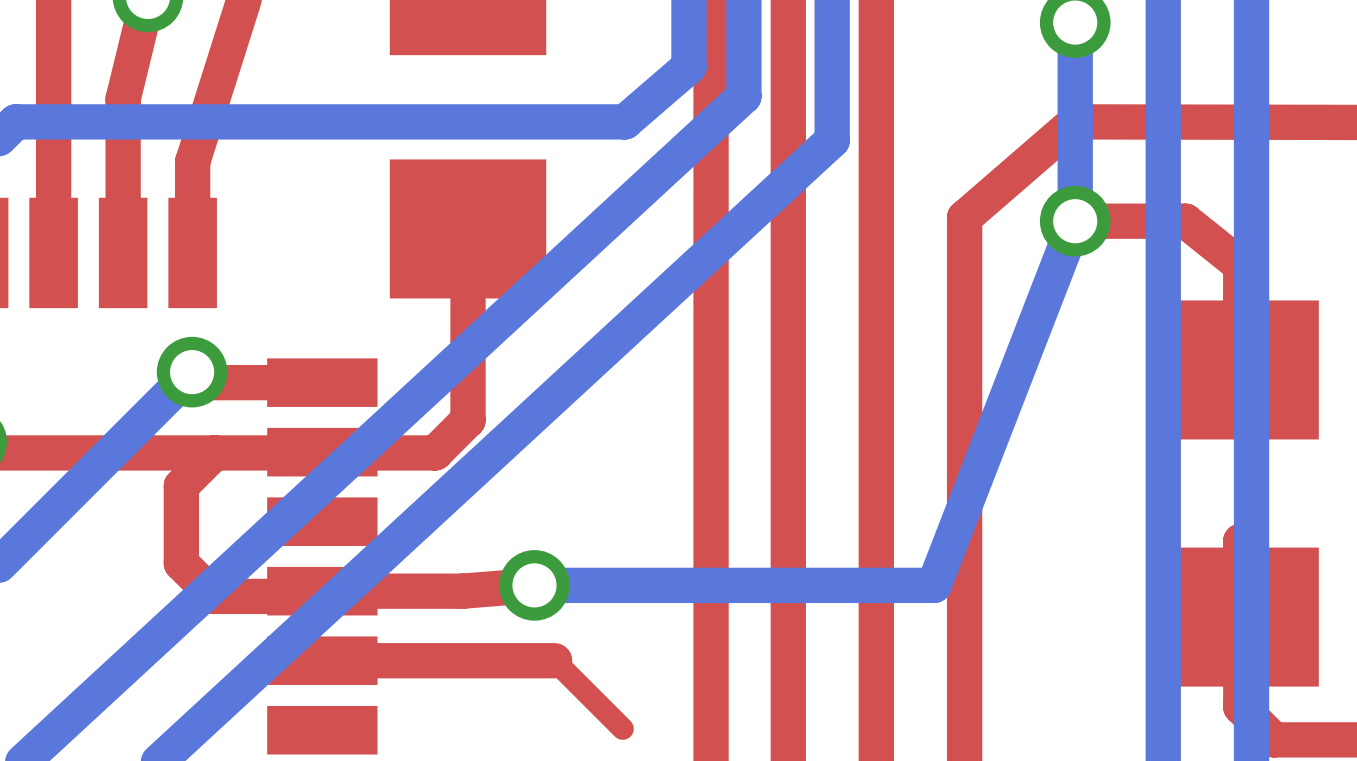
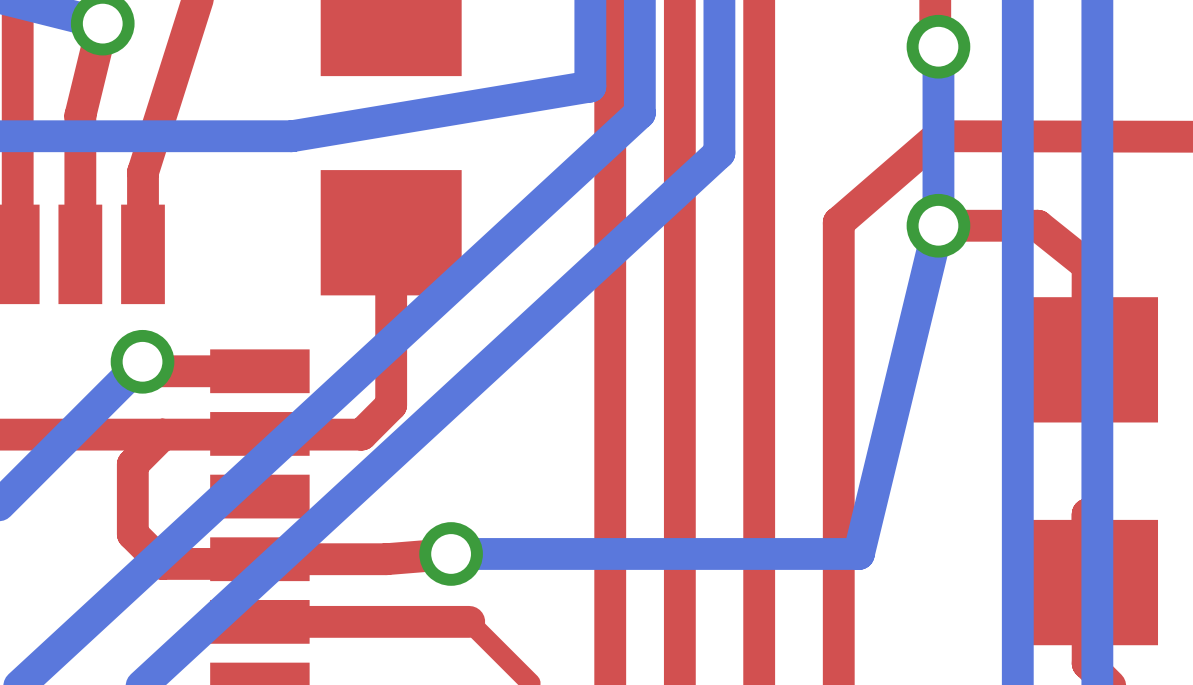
bottom track: (688, 66) (624, 121) (357, 121) -> (590, 86) (291, 136)
bottom track: (1075, 221) (933, 585) -> (938, 225) (858, 553) (811, 553)

